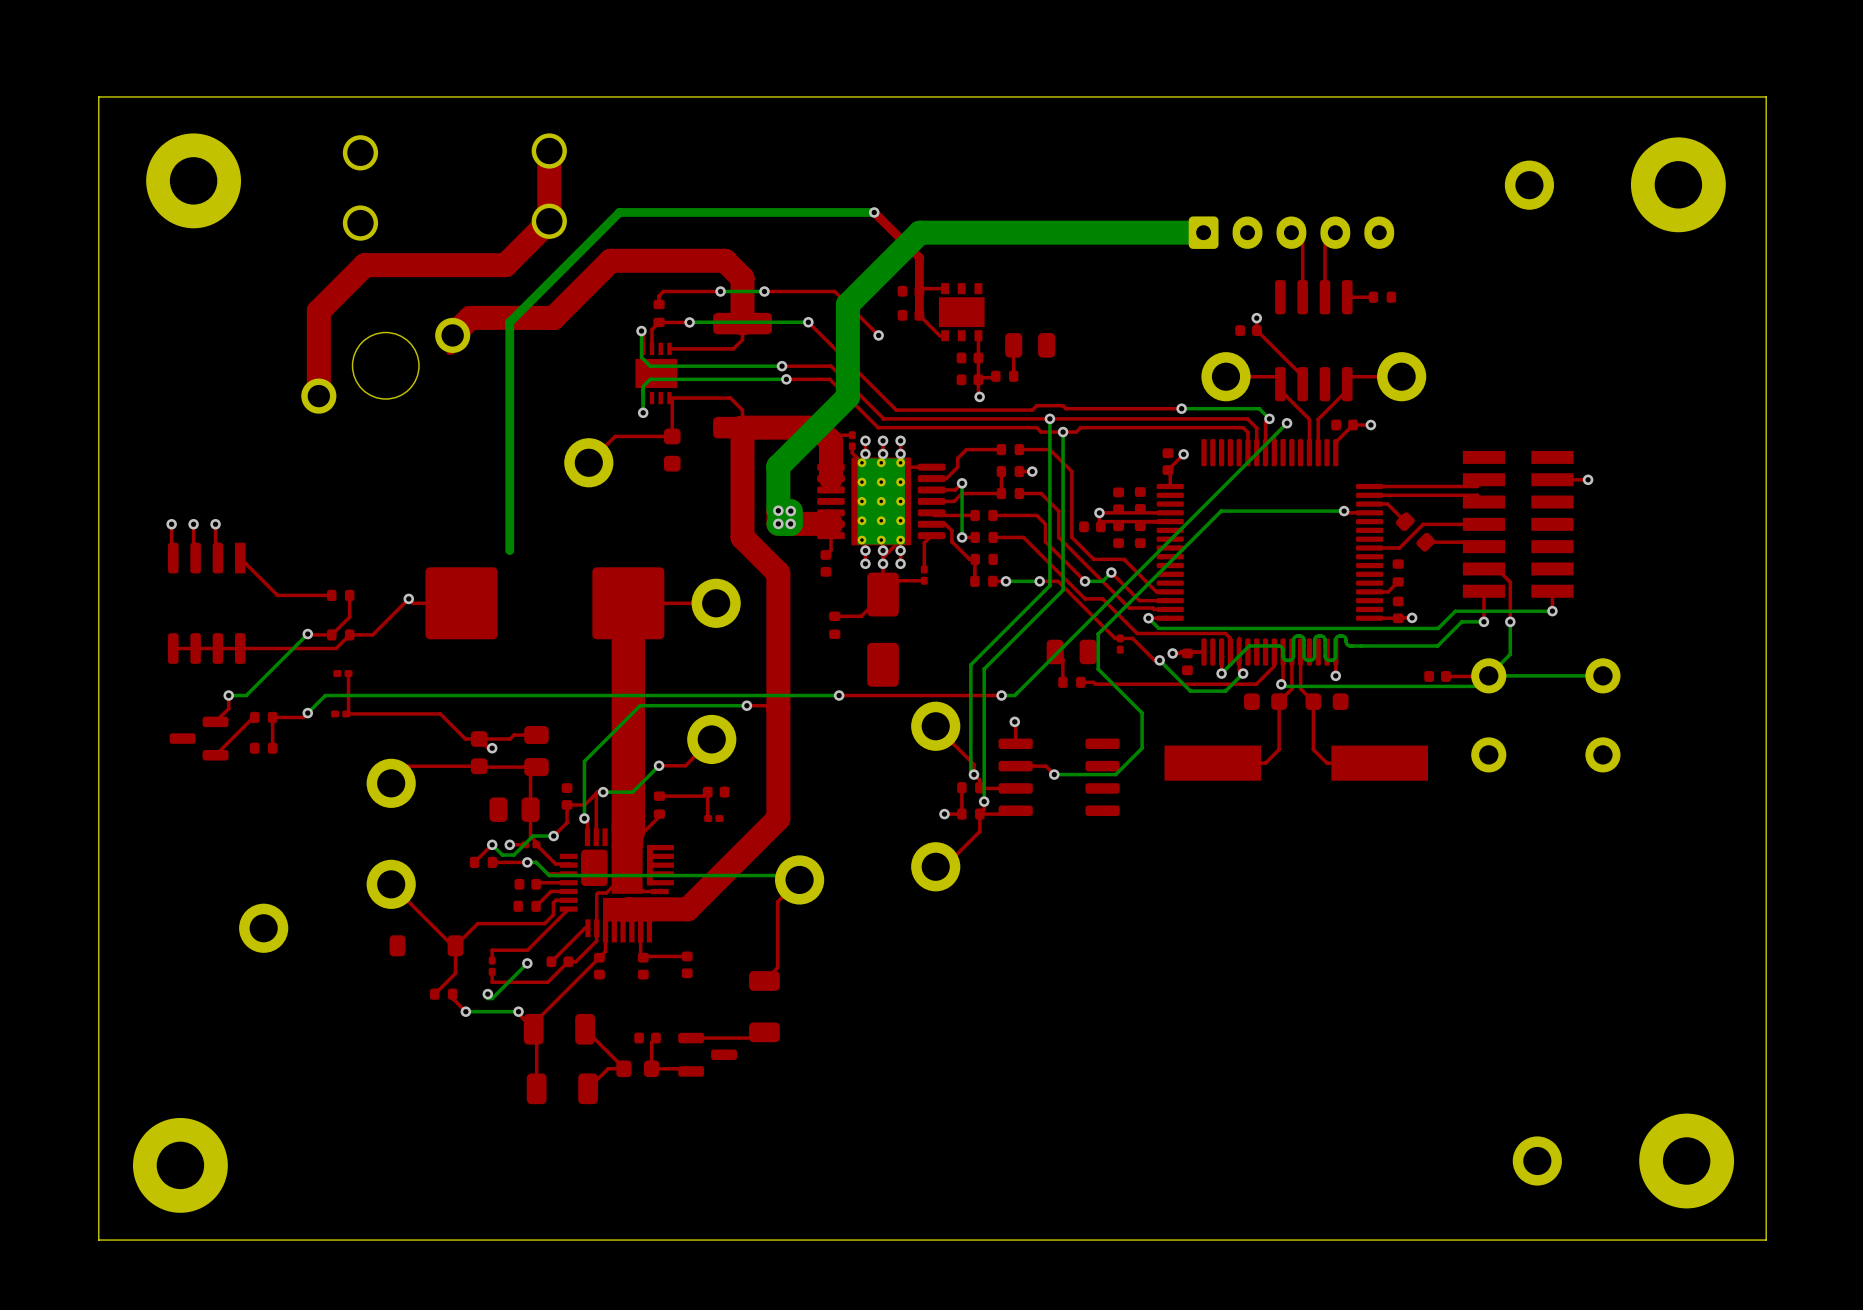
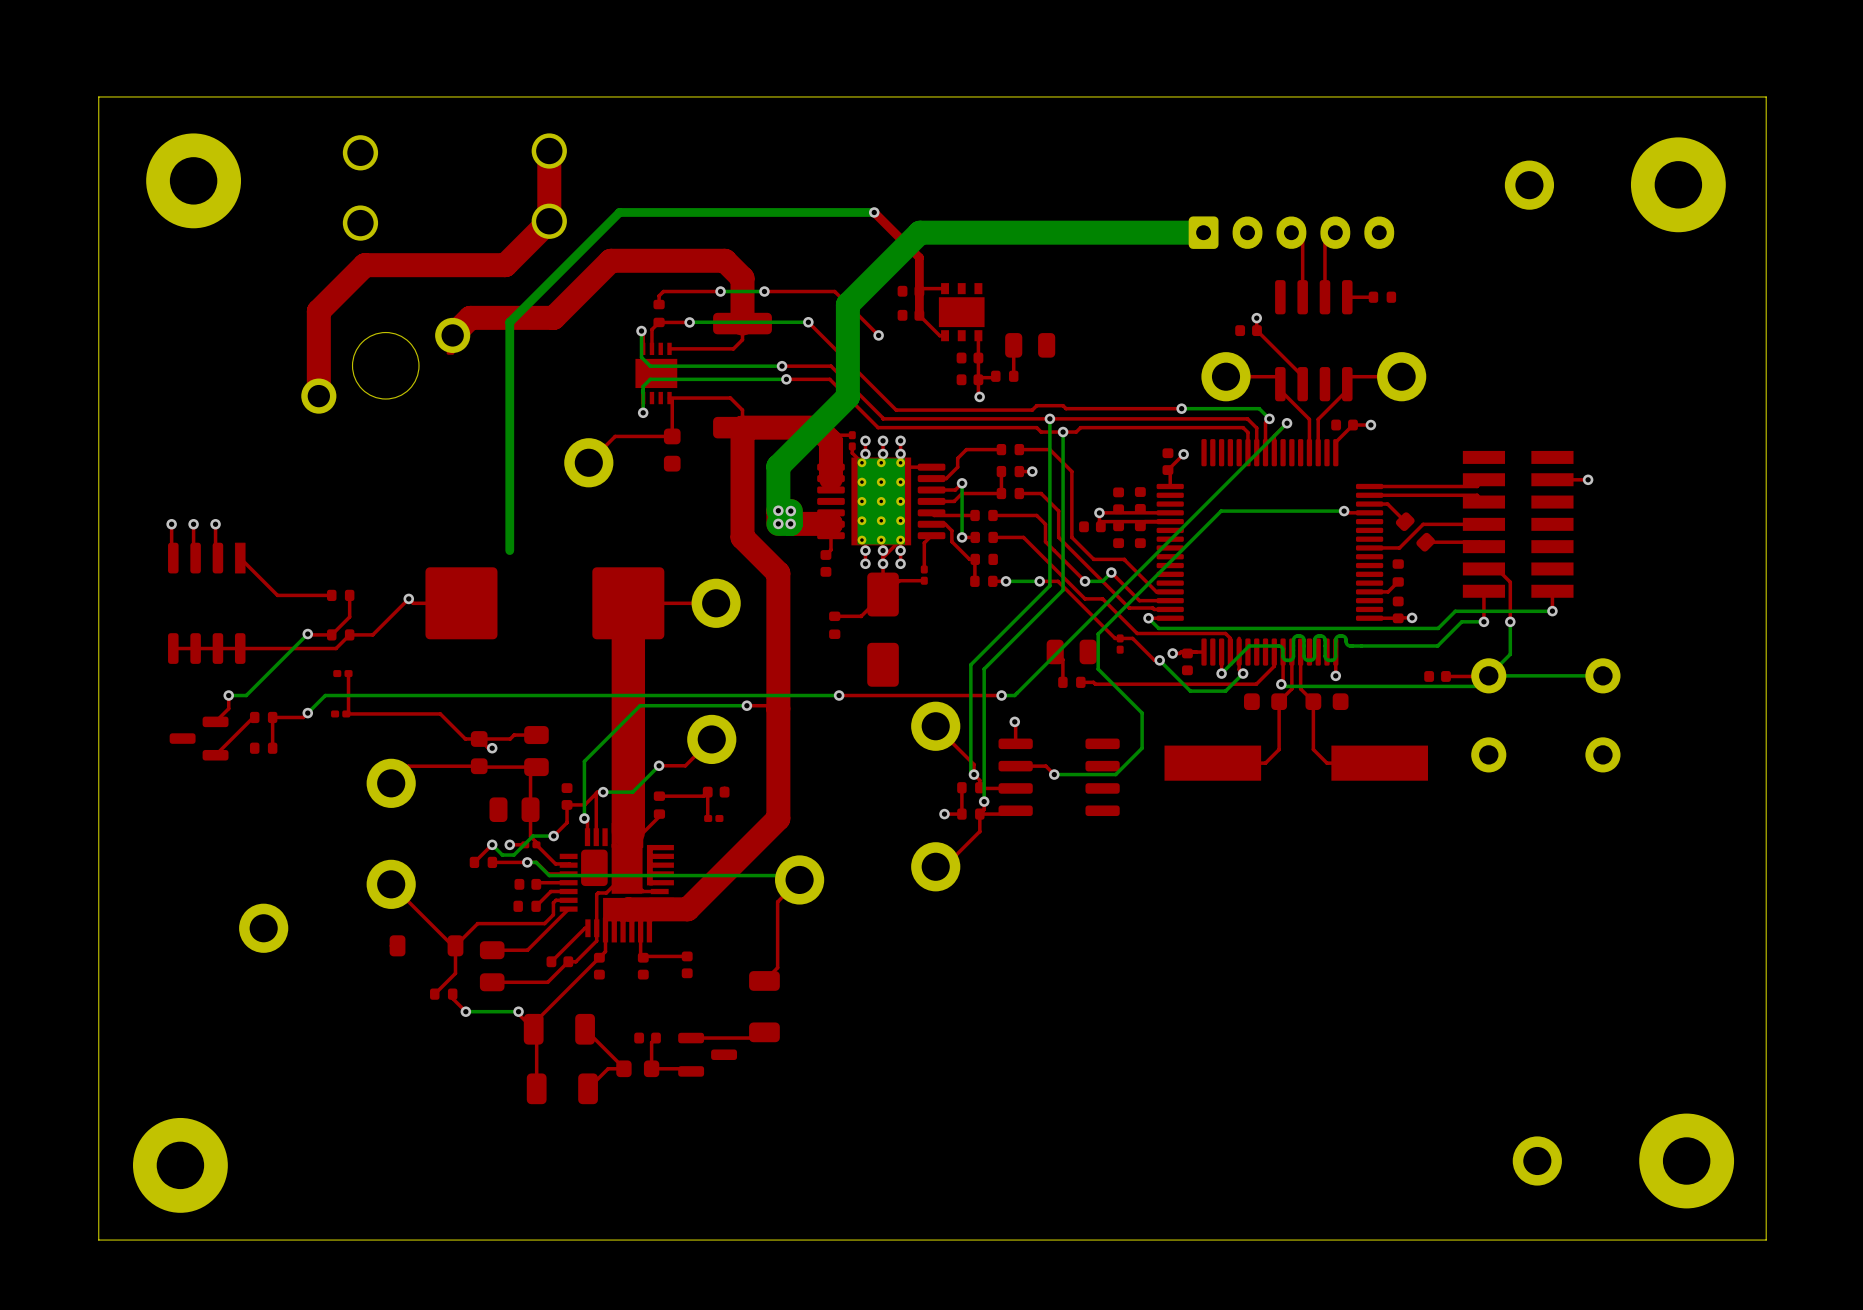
top track: (492, 950) (492, 960) -> none
part footprint: [488, 956, 496, 976] -> [479, 941, 505, 992]
bottom track: (527, 963) (492, 998) (487, 998) (487, 994) -> none
via: (527, 963) -> none
top track: (492, 971) (492, 982) -> none
via: (487, 994) -> none

